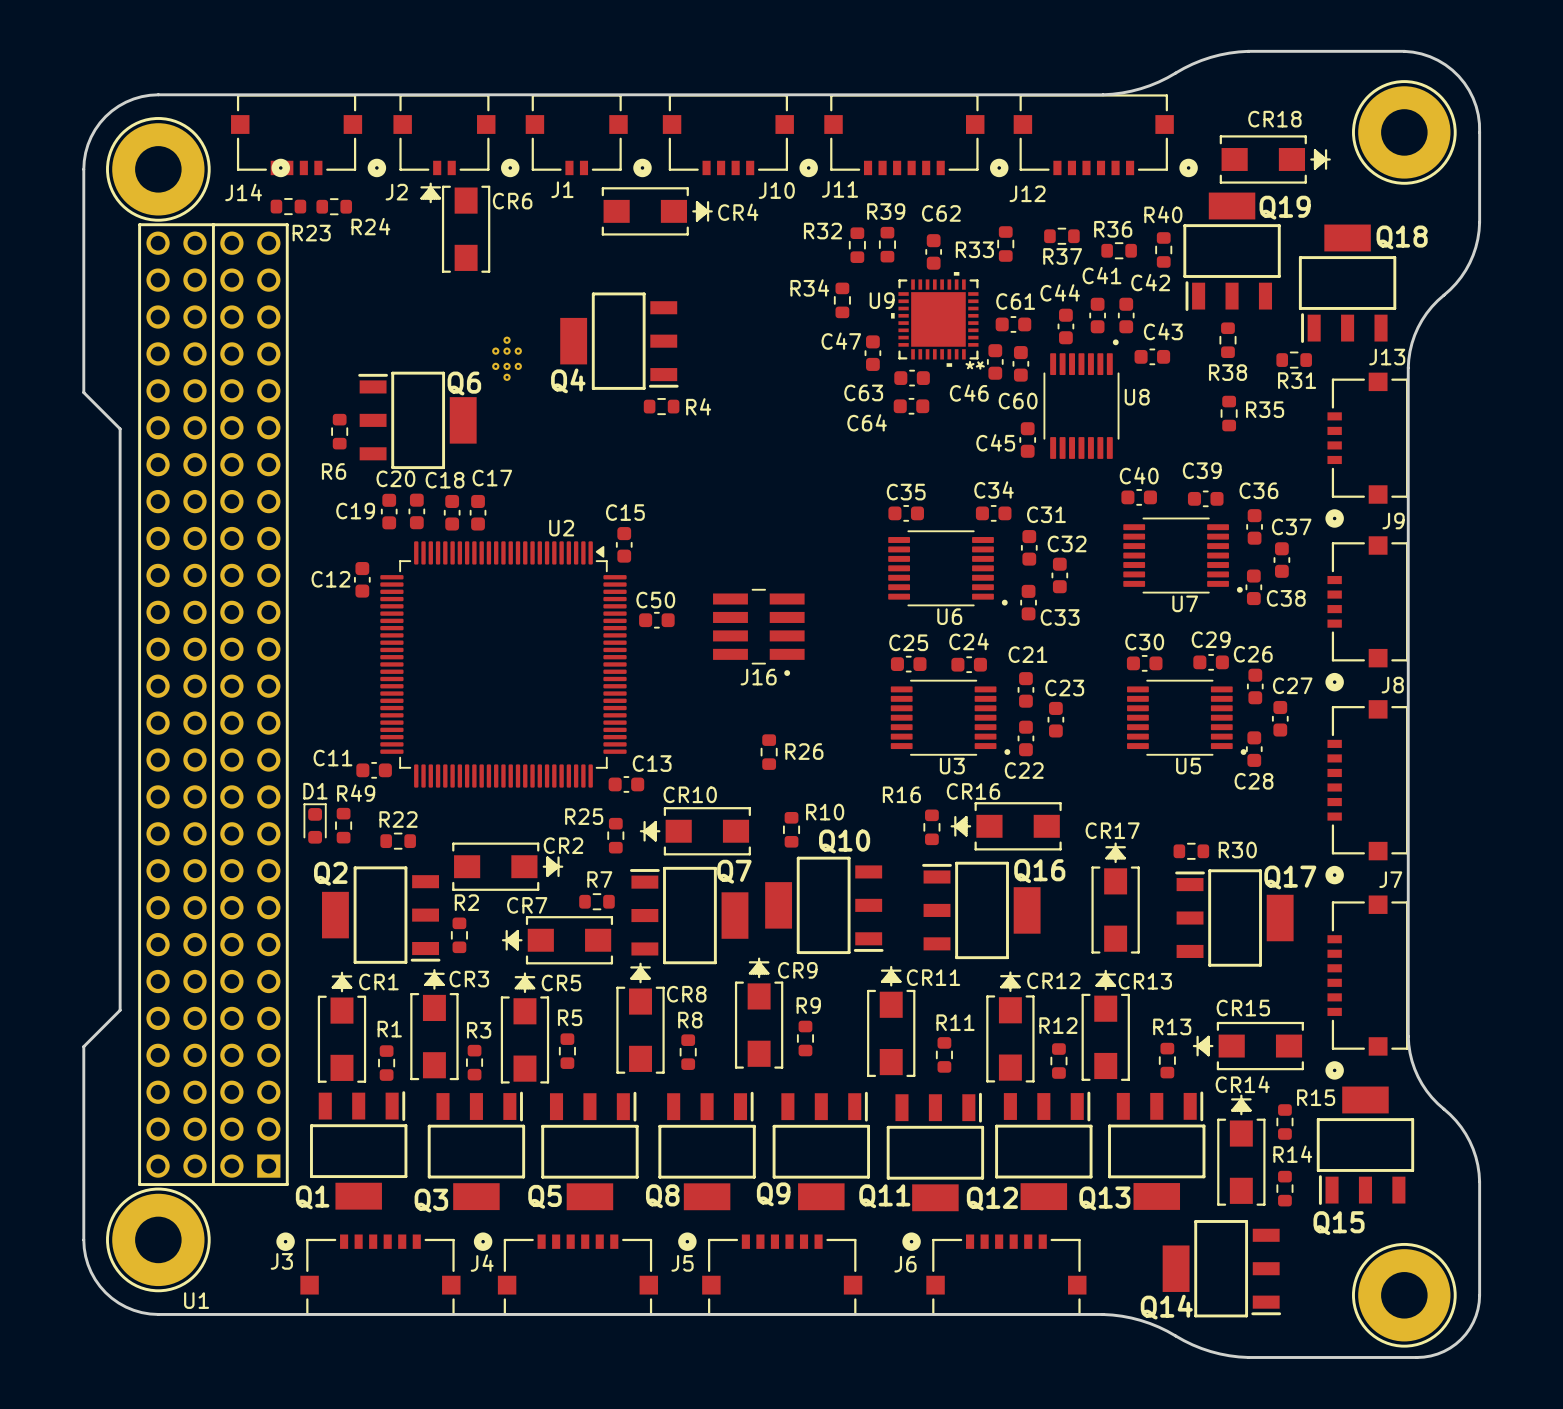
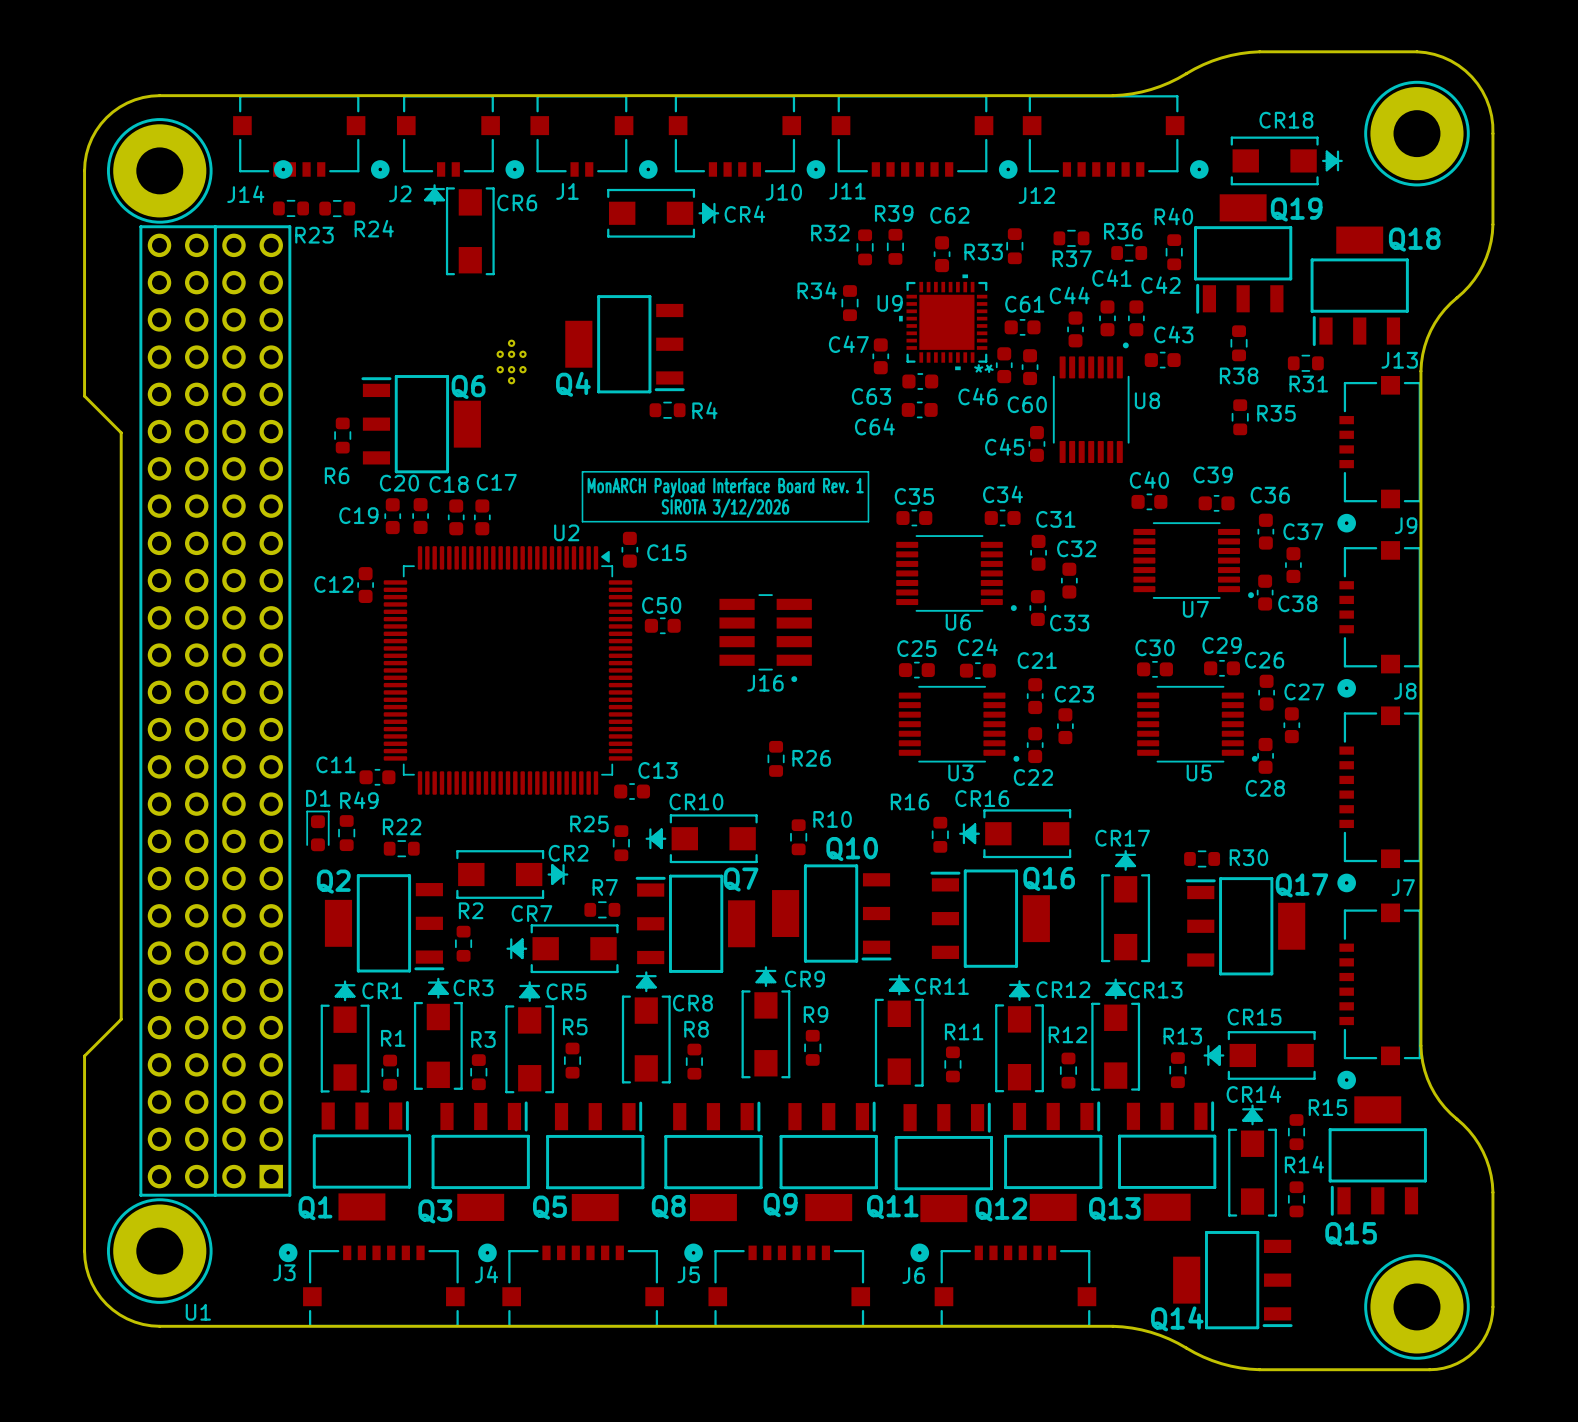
line: none -> (582, 471) (868, 471) (868, 521) (582, 521) (582, 471)
text: none -> MonARCH Payload Interface Board Rev. 1 (725, 487)
text: none -> SIROTA 3/12/2026 (725, 508)
C15 name position: C15 (625, 512) -> C15 (666, 552)

